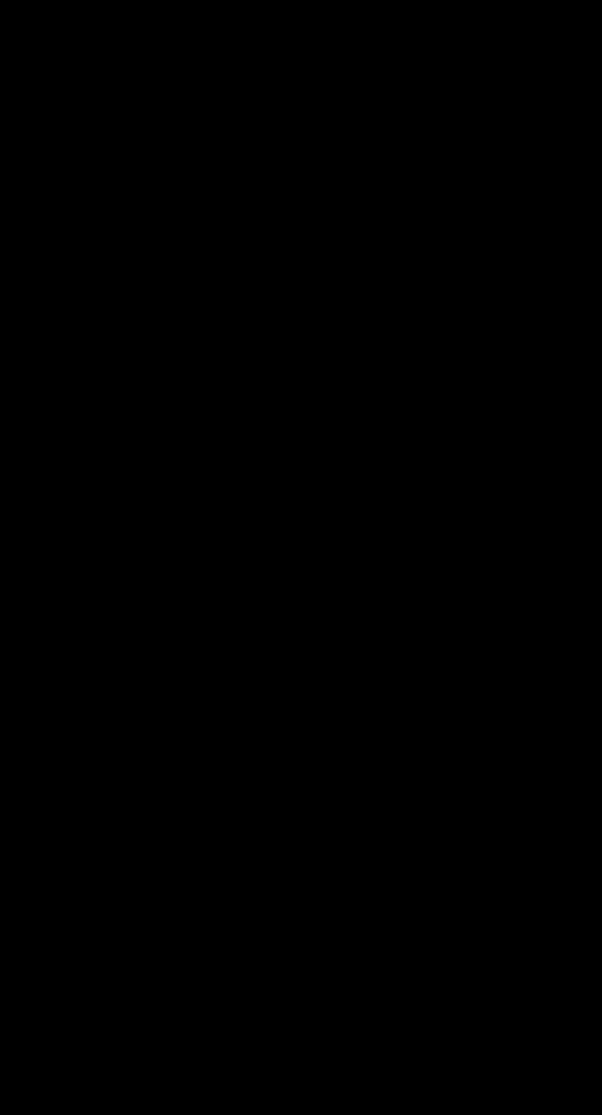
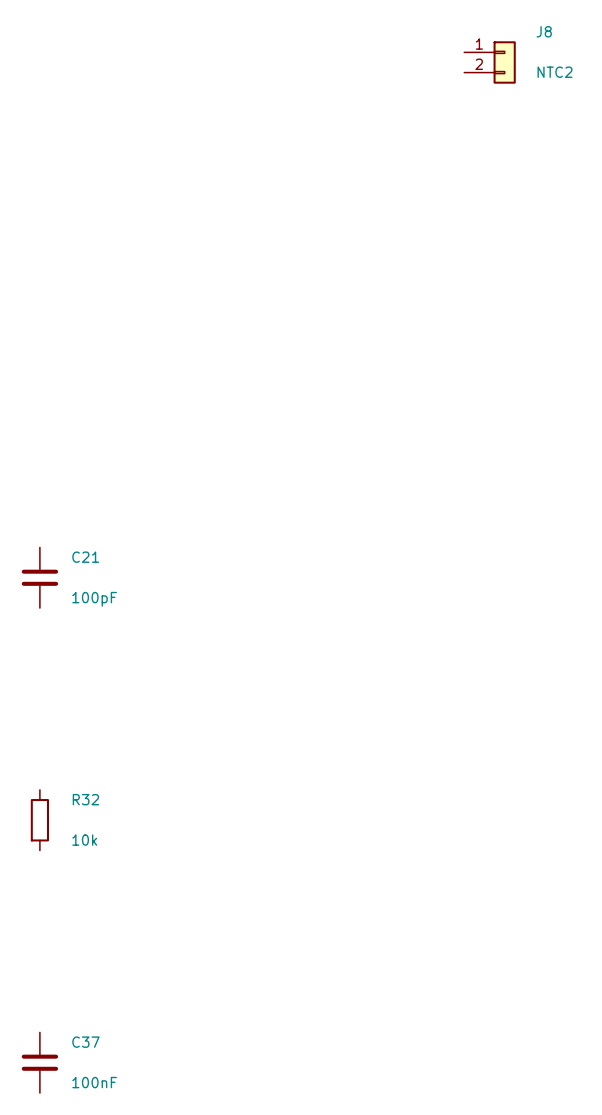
J8: none -> NTC2 (490, 62)
C21: none -> 100pF (39, 577)
R32: none -> 10k (39, 820)
C37: none -> 100nF (39, 1062)

